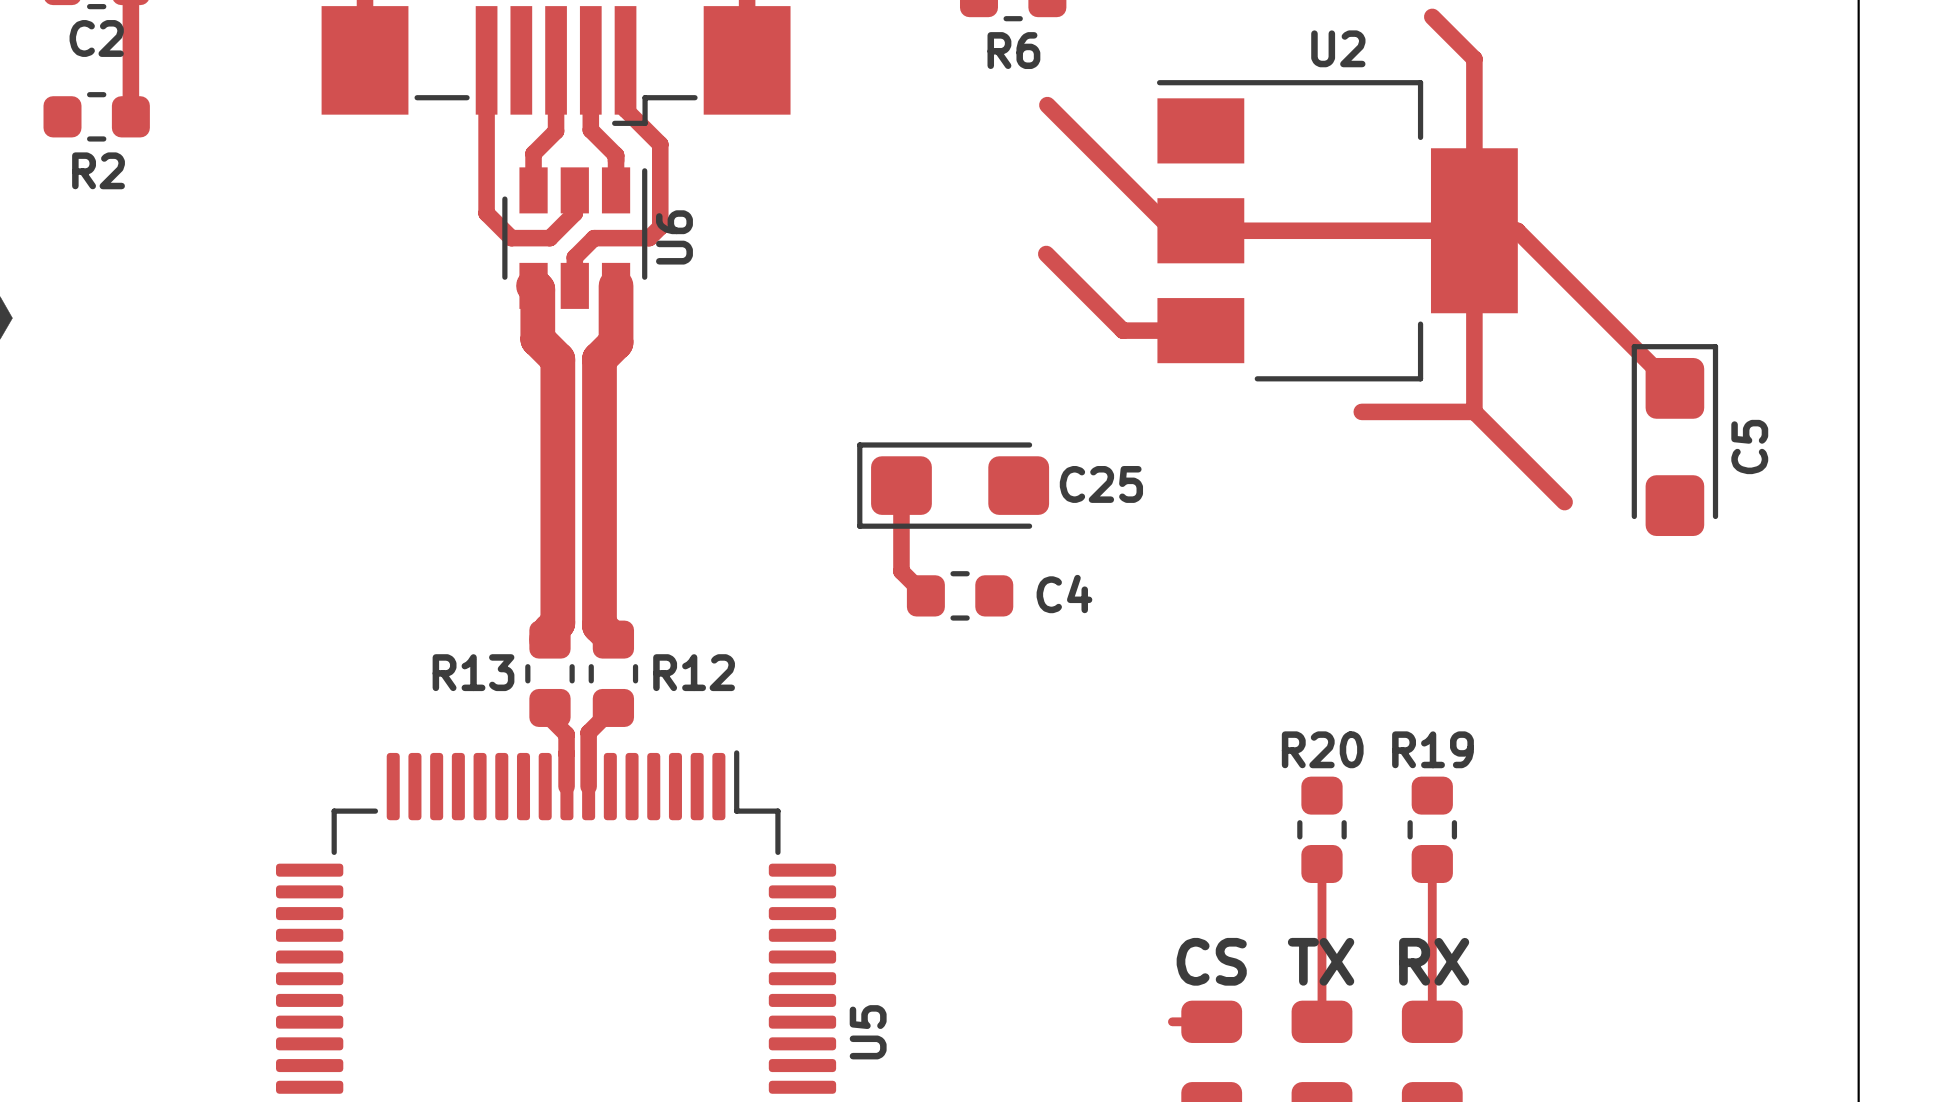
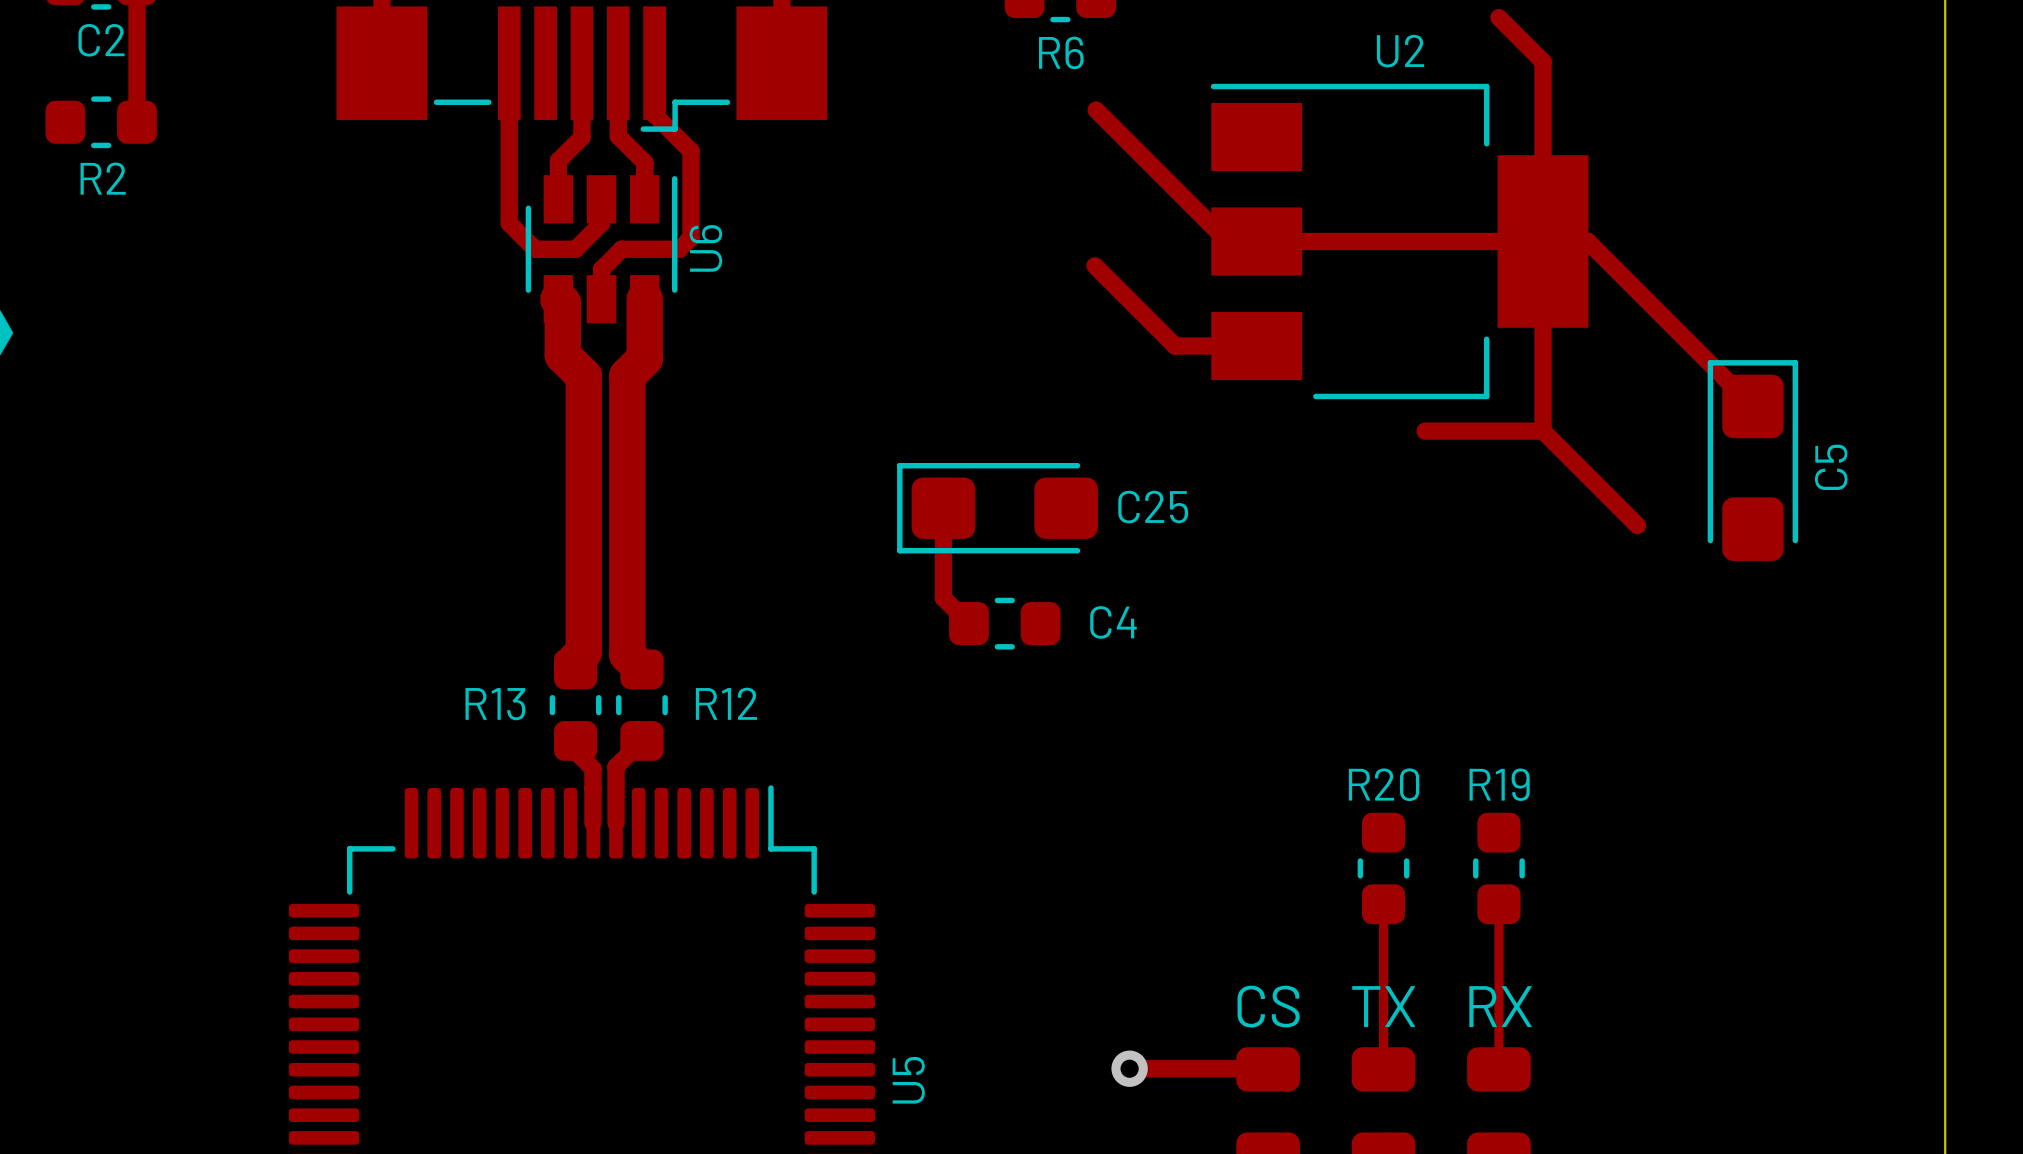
track: none -> (1129, 1068) (1268, 1069)
via: none -> (1129, 1068)

